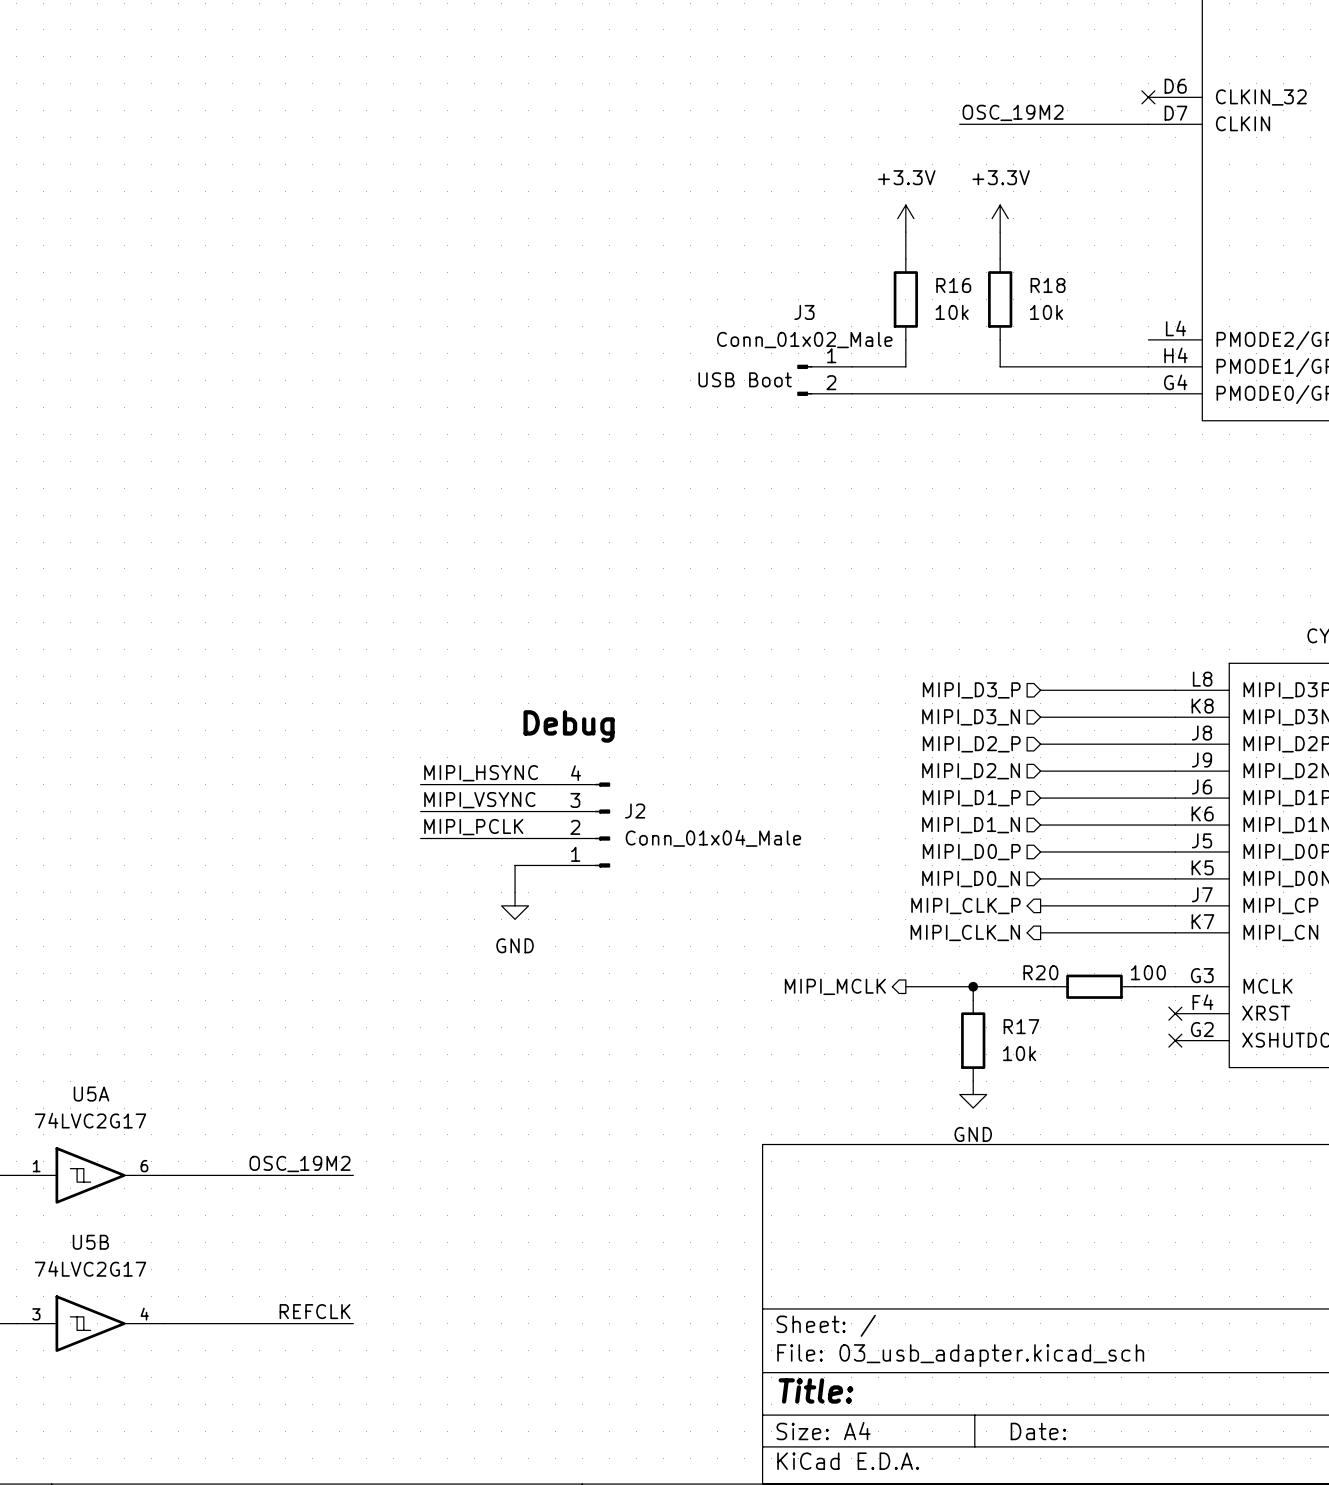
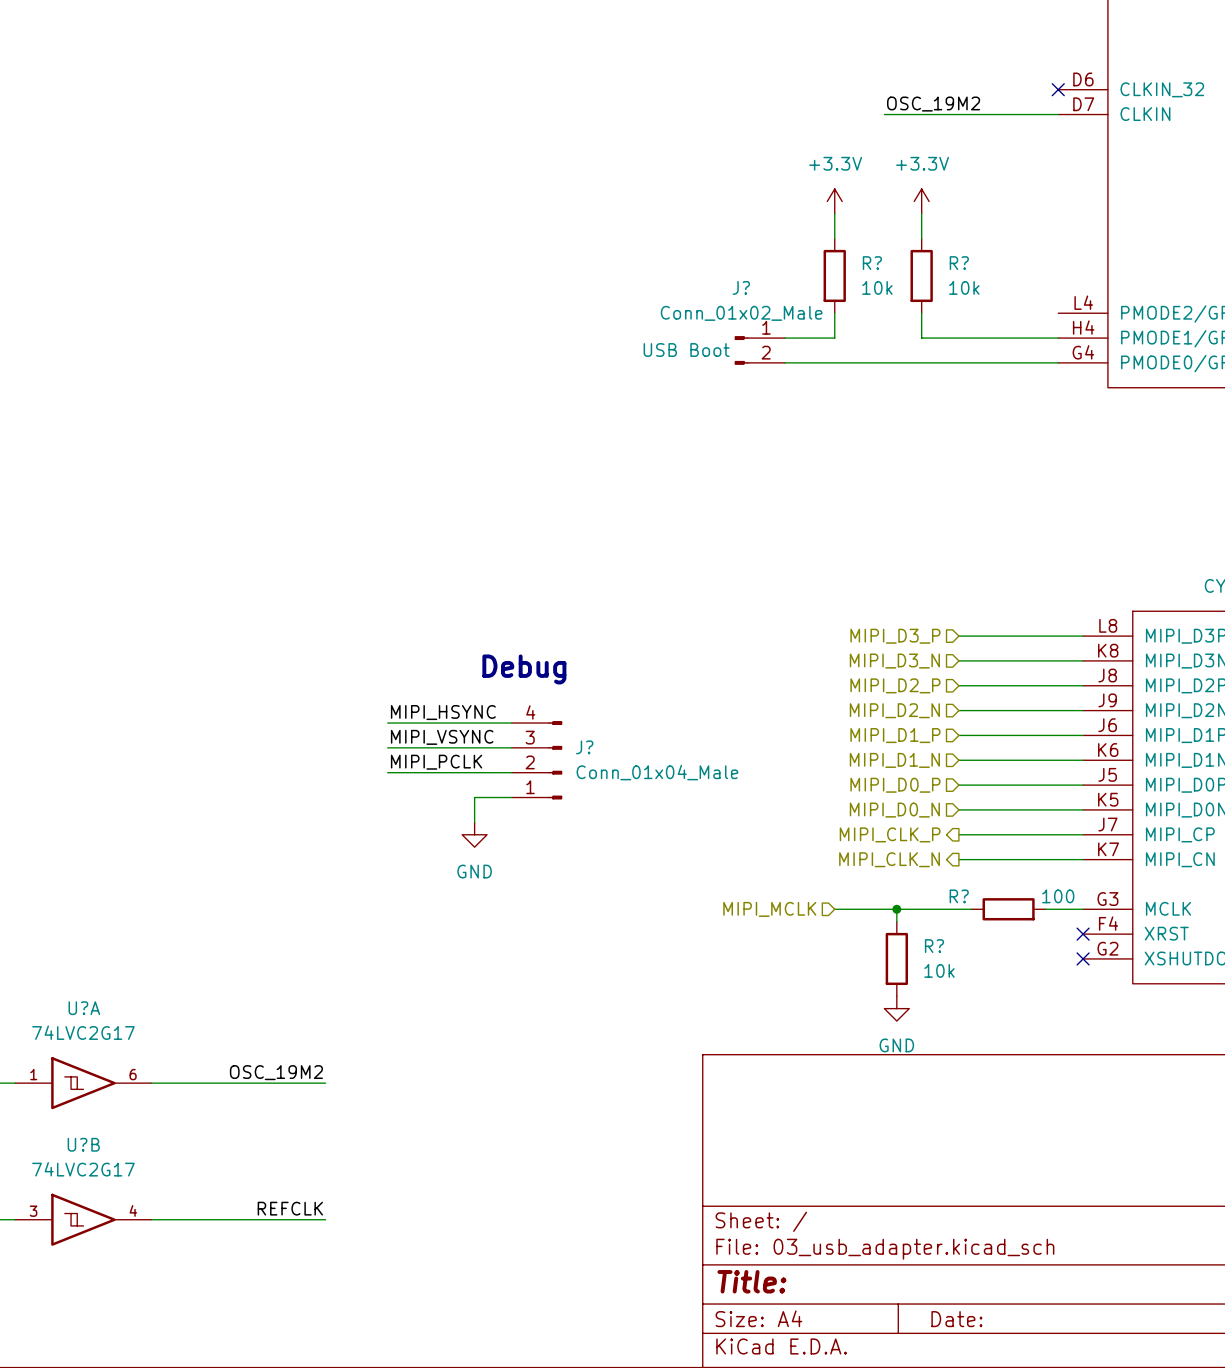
R16 name: R16 (953, 285) -> R? (872, 263)
R18 name: R18 (1048, 285) -> R? (959, 263)
J3 name: J3 (804, 312) -> J? (741, 287)
J2 name: J2 (635, 811) -> J? (584, 747)
R20 name: R20 (1040, 972) -> R? (959, 896)
hierarchical label shape: output (835, 986) -> input (769, 909)
R17 name: R17 (1021, 1026) -> R? (934, 946)
U5A name: U5A (91, 1094) -> U?A (84, 1008)
U5B name: U5B (90, 1242) -> U?B (83, 1144)

